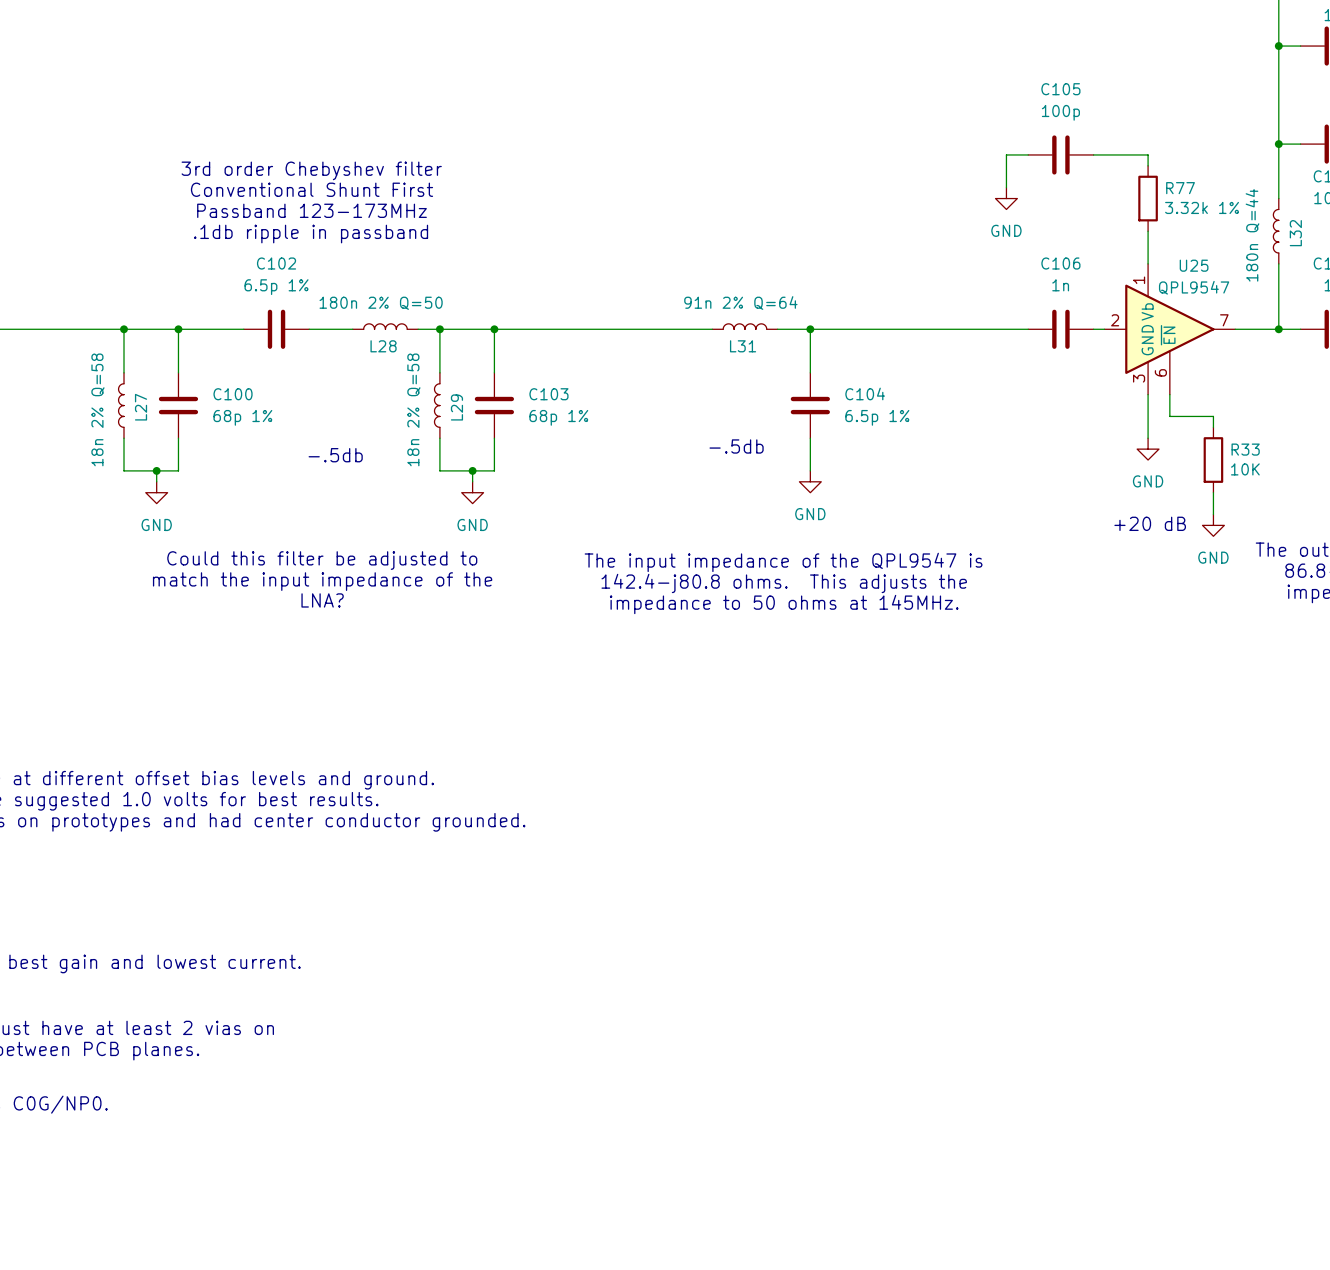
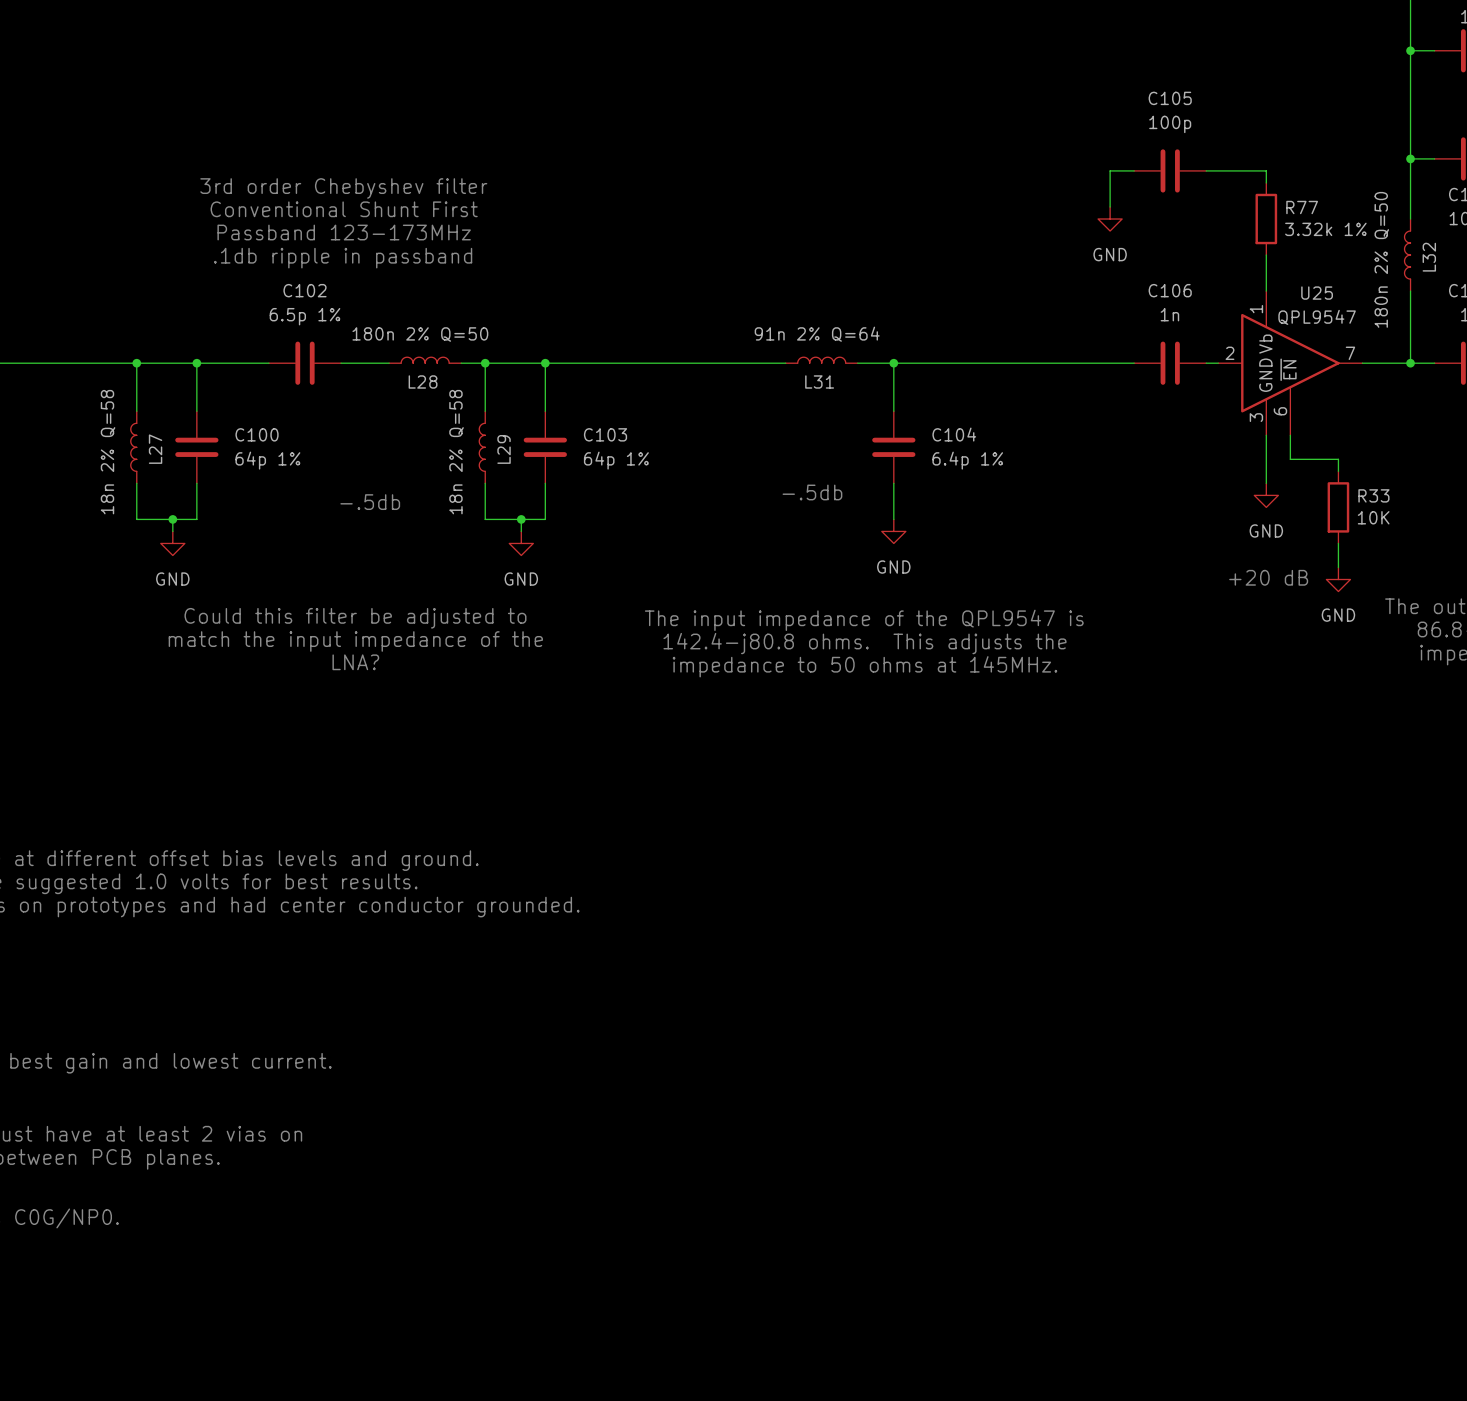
L32 value: 180n Q=44 (1252, 235) -> 180n 2% Q=50 (1381, 259)
C100 value: 68p 1% (242, 417) -> 64p 1% (267, 460)
C103 value: 68p 1% (558, 417) -> 64p 1% (616, 460)
C104 value: 6.5p 1% (877, 417) -> 6.4p 1% (967, 460)

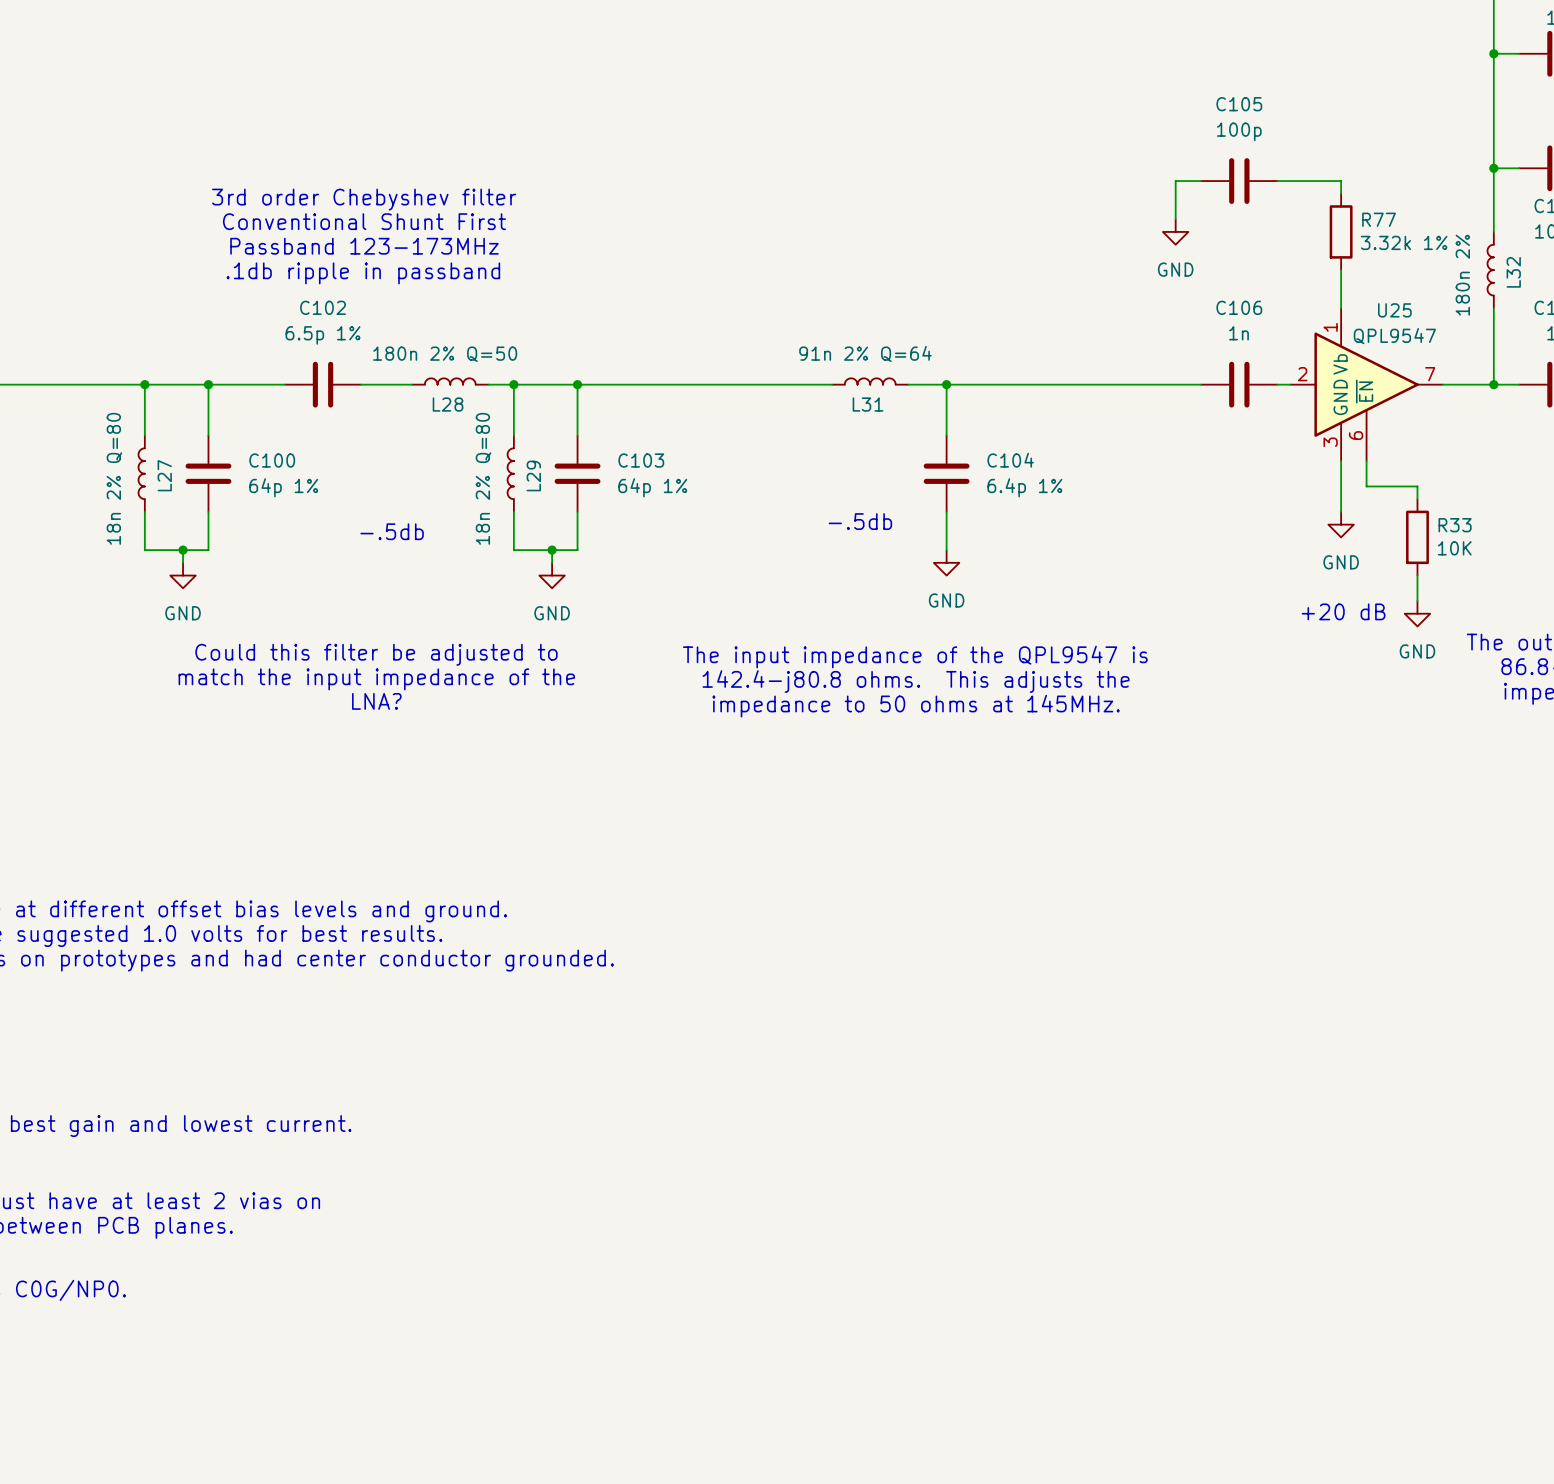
L32 value: 180n 2% Q=50 (1381, 259) -> 180n 2% (1462, 275)
L27 value: 18n 2% Q=58 (108, 452) -> 18n 2% Q=80 (114, 478)
L29 value: 18n 2% Q=58 (456, 452) -> 18n 2% Q=80 (483, 478)

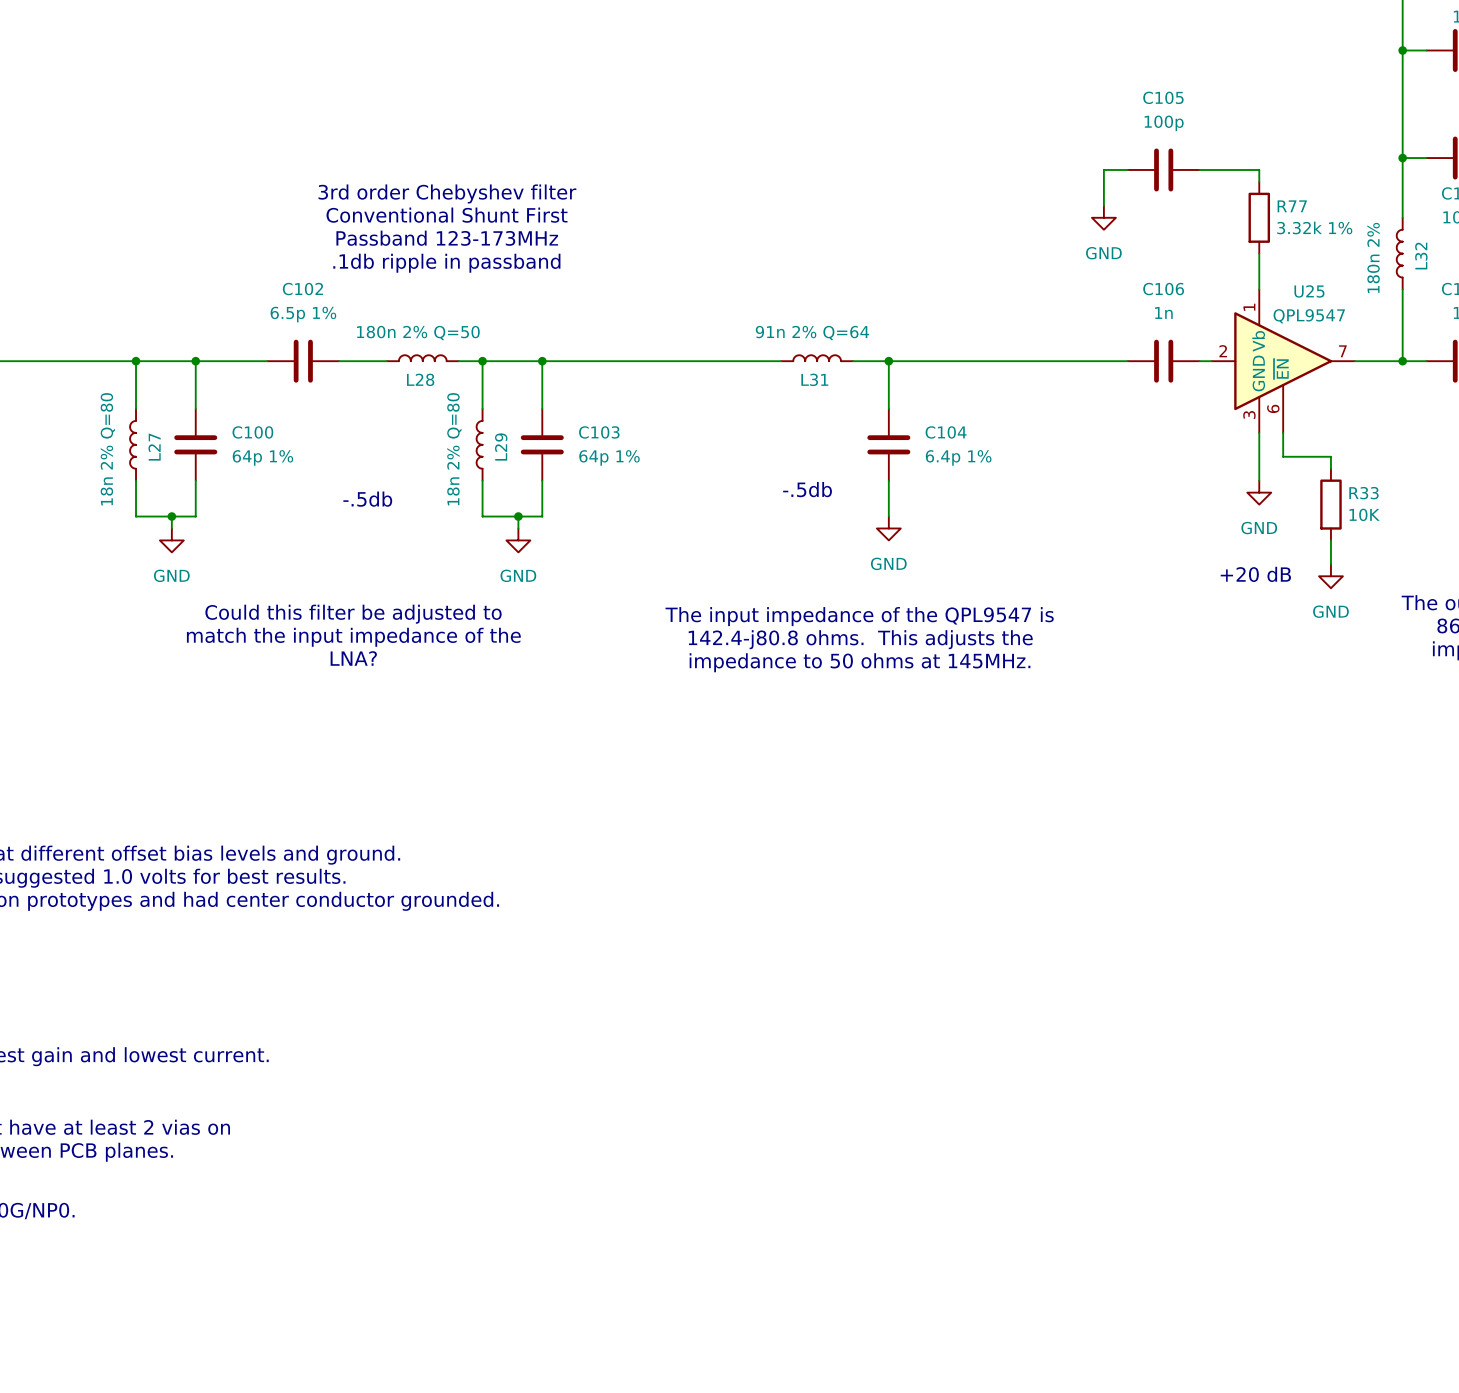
text position: 3rd order Chebyshev filter (364, 199) -> 3rd order Chebyshev filter (447, 193)
text position: Conventional Shunt First (364, 221) -> Conventional Shunt First (447, 215)
text position: Passband 123-173MHz (364, 246) -> Passband 123-173MHz (447, 238)
text position: .1db ripple in passband (363, 273) -> .1db ripple in passband (446, 263)

